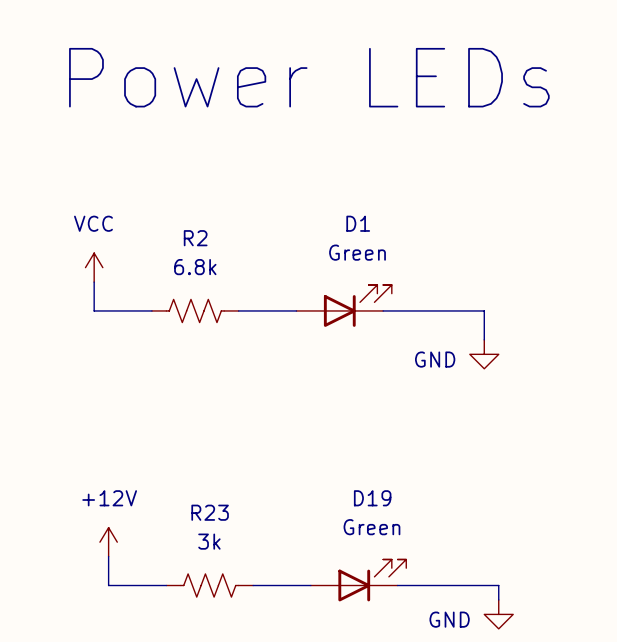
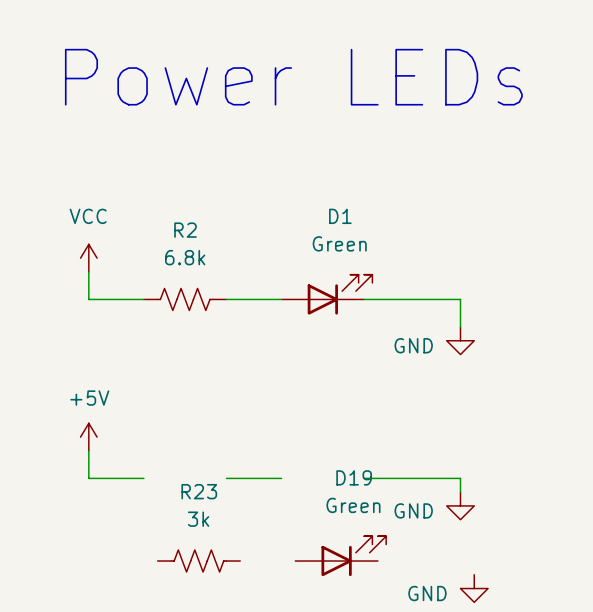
power symbol: none -> +5V (88, 437)
power symbol: none -> GND (460, 505)
power symbol: +12V (108, 542) -> none
wire: (108, 556) (108, 585) (166, 585) -> (88, 450) (88, 478) (143, 478)
wire: (253, 585) (310, 585) -> (226, 478) (281, 478)
wire: (397, 585) (498, 585) (498, 599) -> (364, 478) (460, 478) (460, 492)

